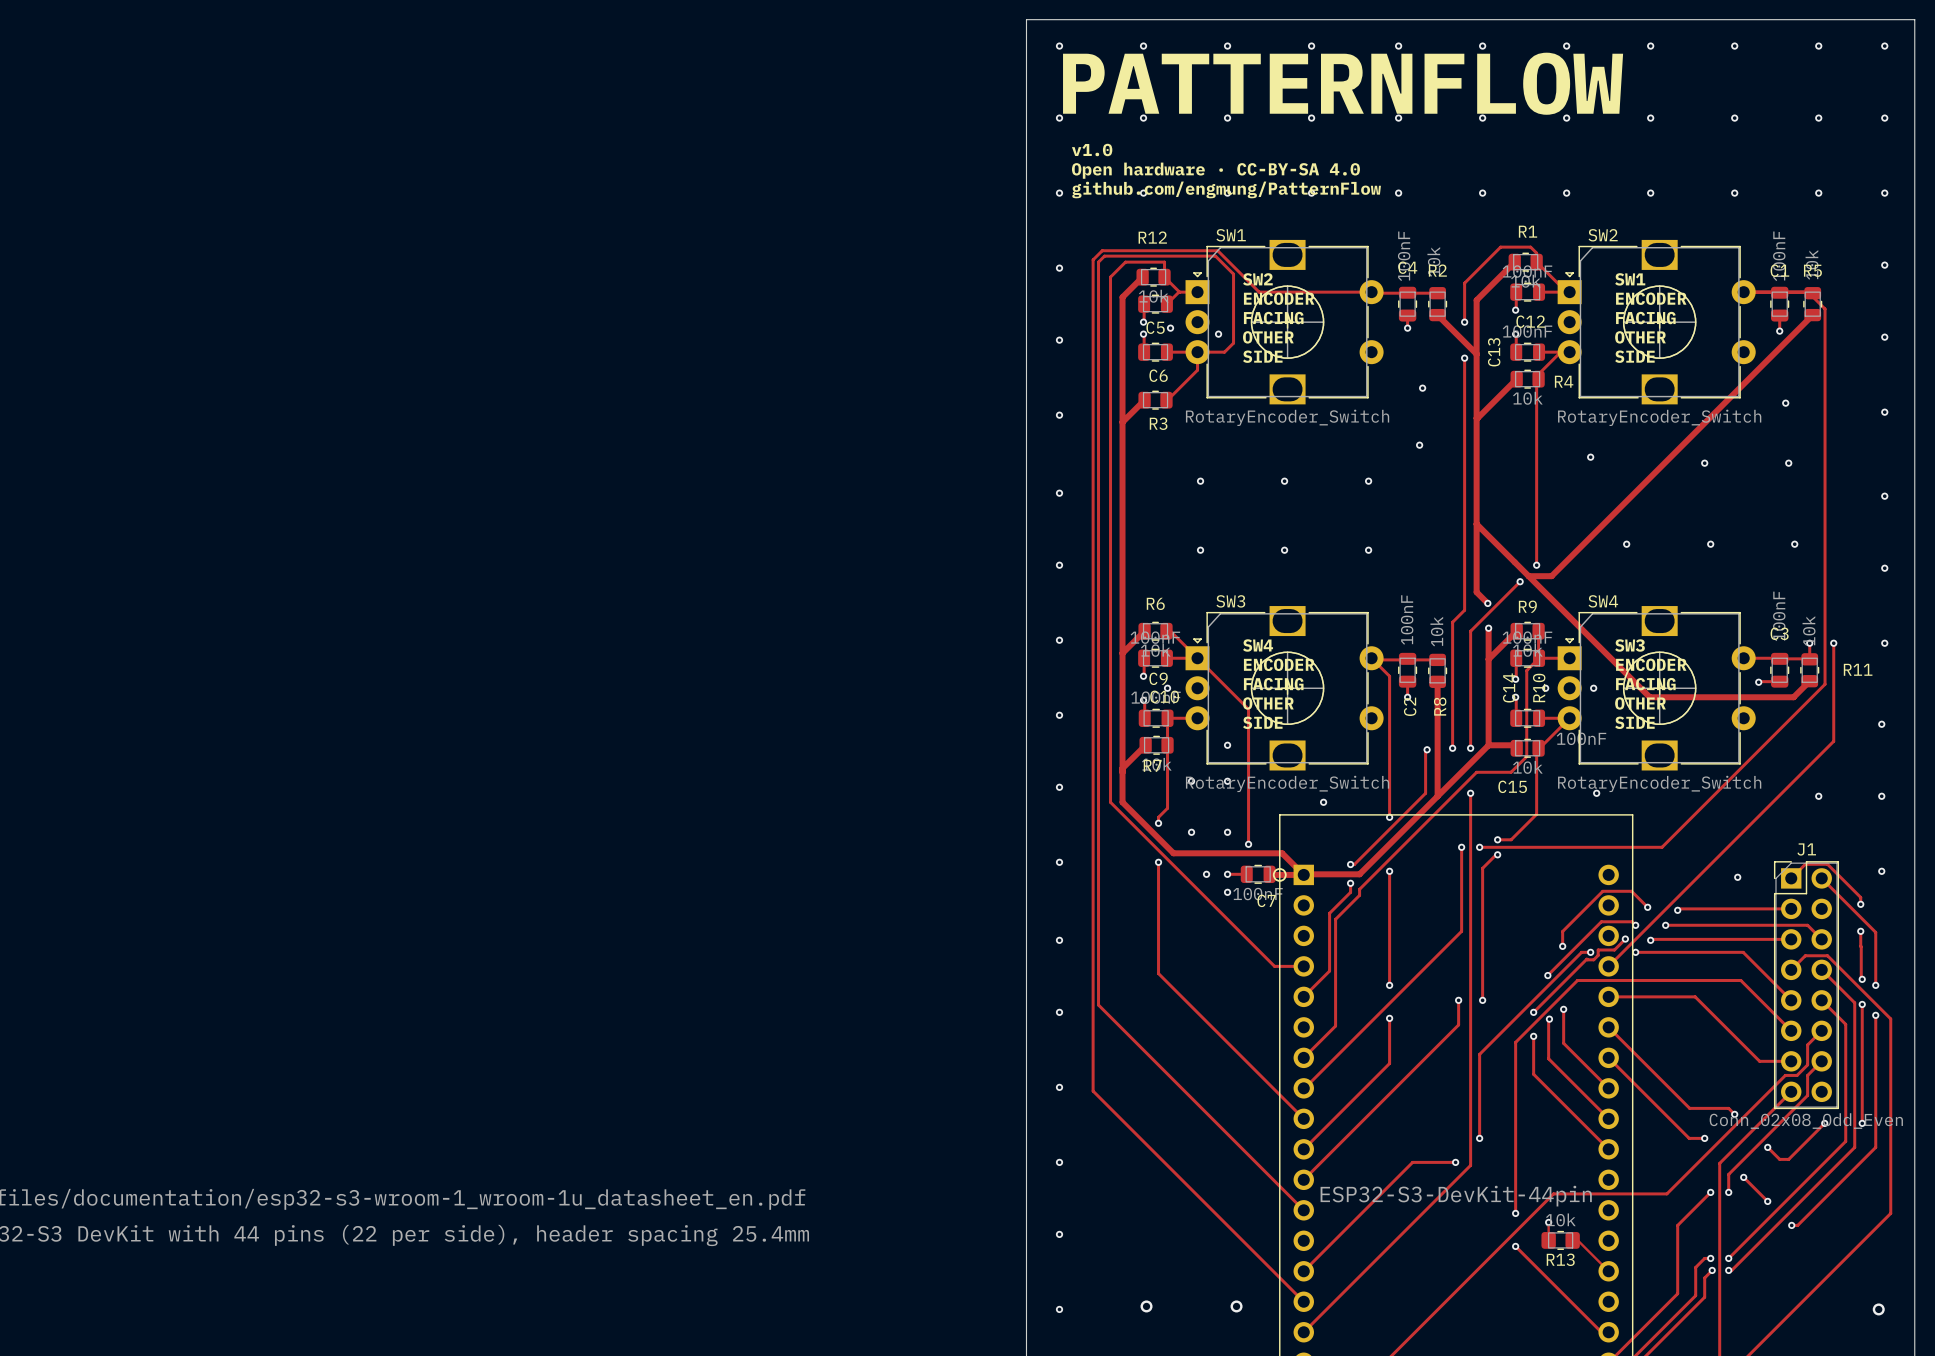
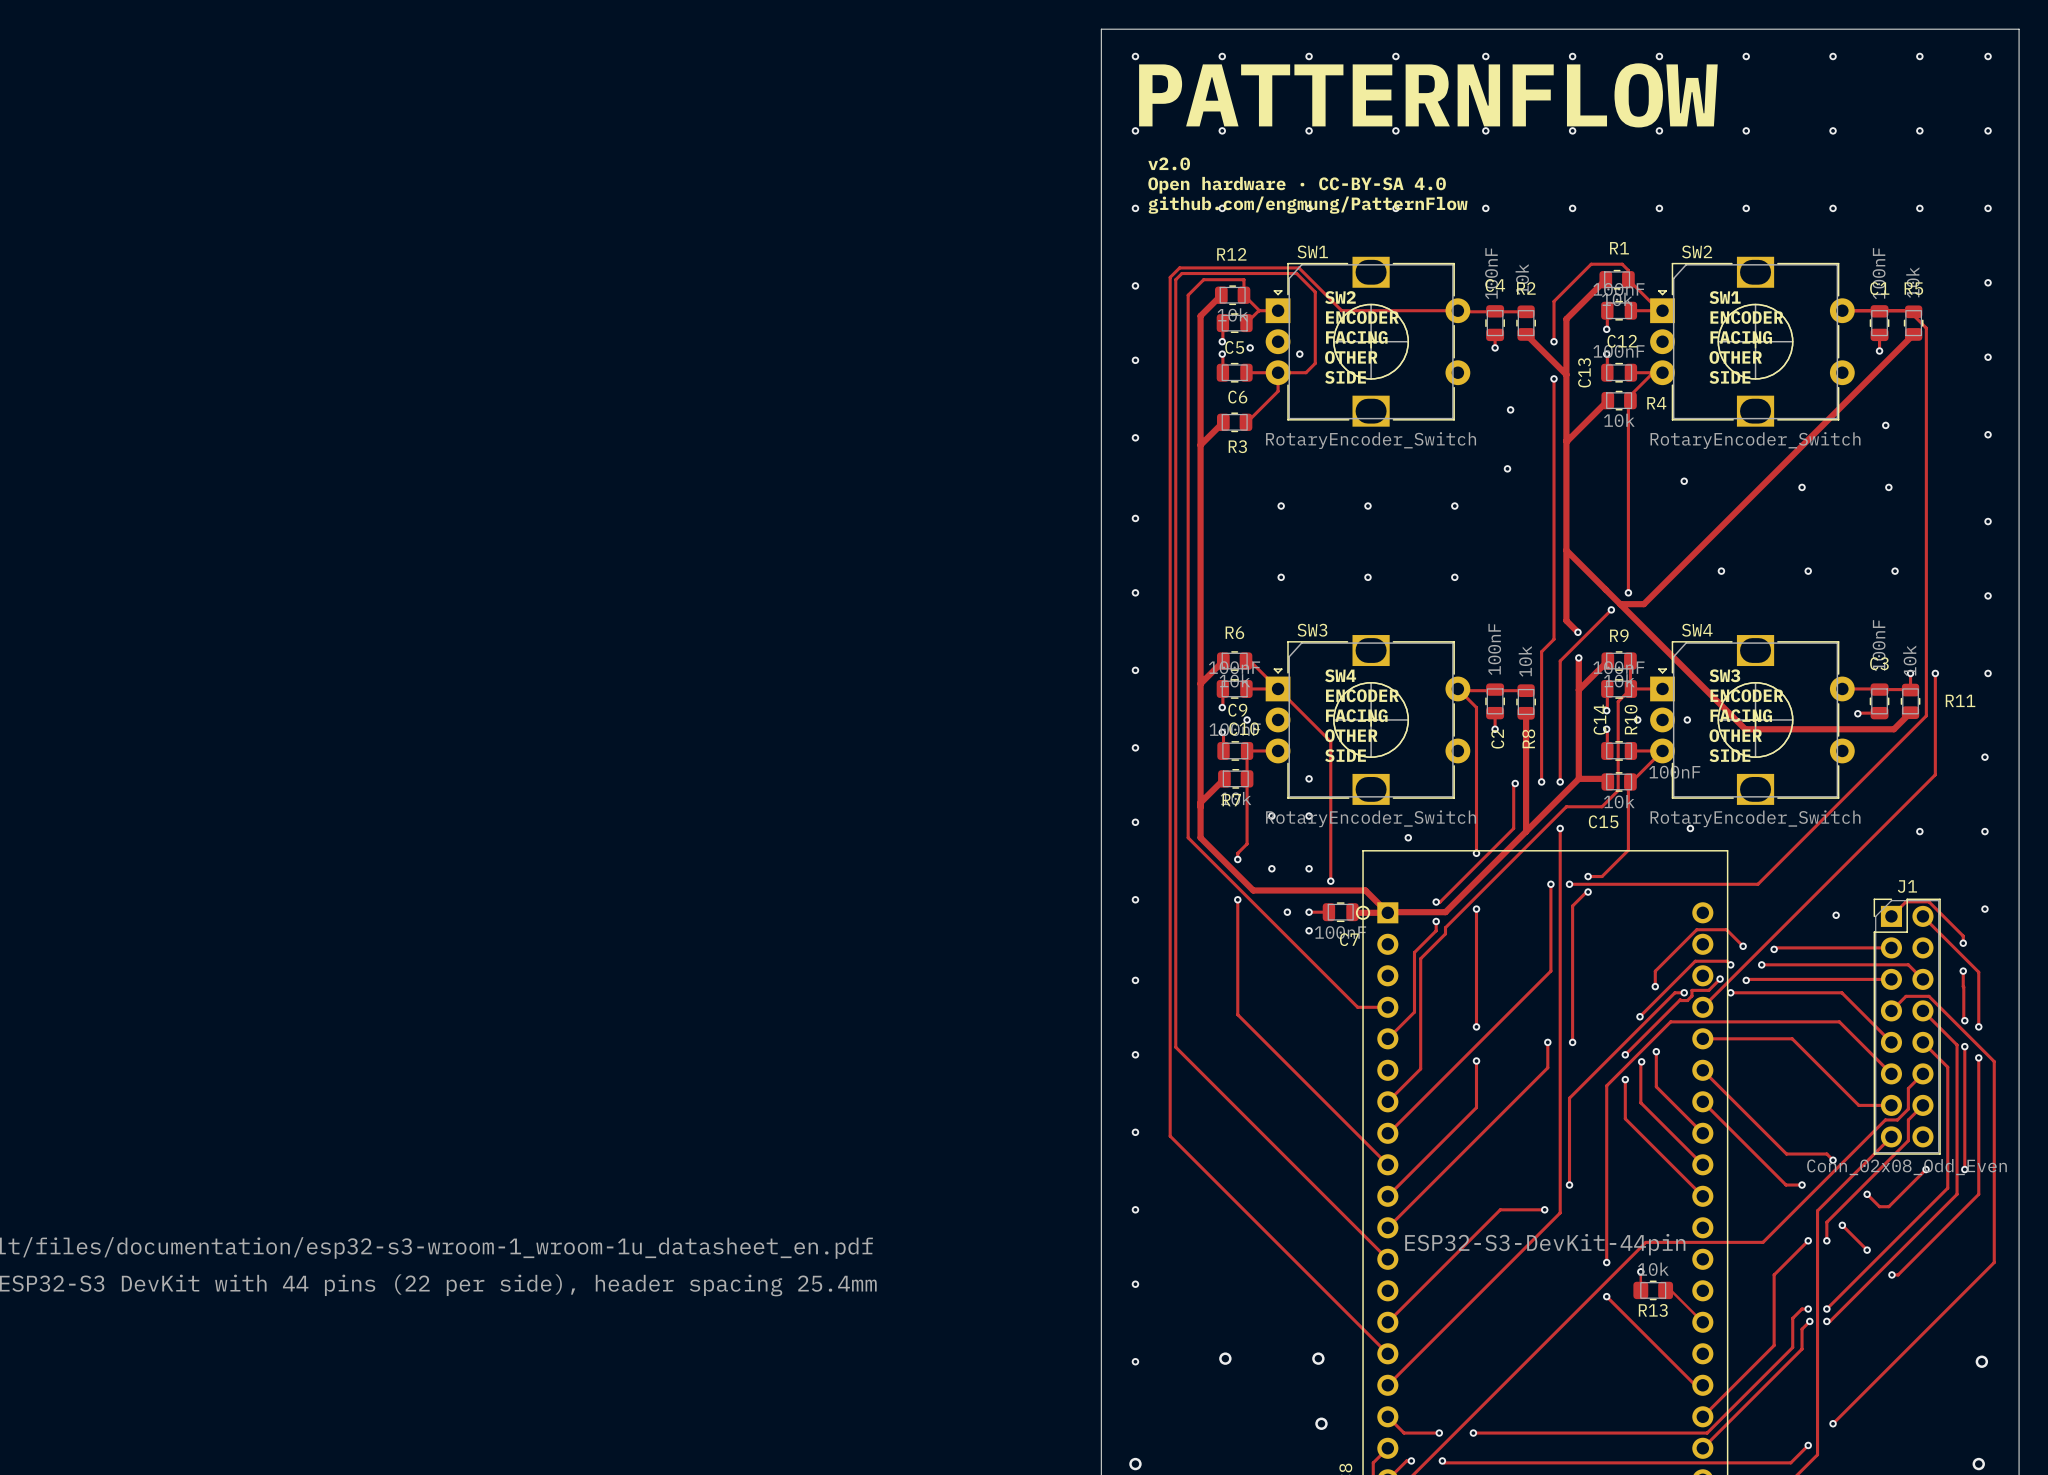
text: v1.0 (1092, 149) -> v2.0 (1169, 163)

